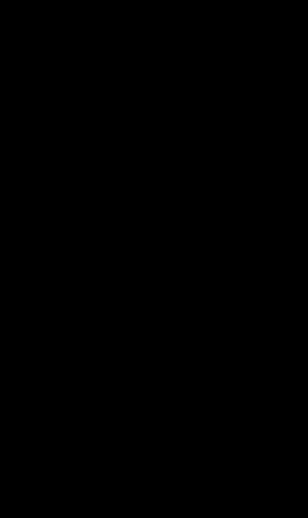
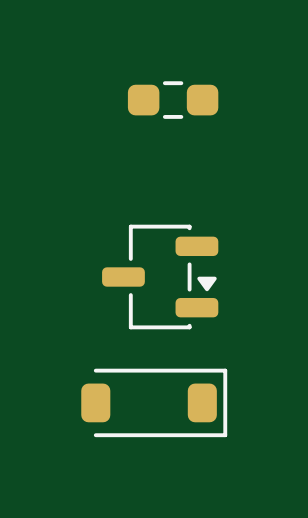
part: none -> (173, 100)
part: none -> (160, 277)
part: none -> (154, 402)

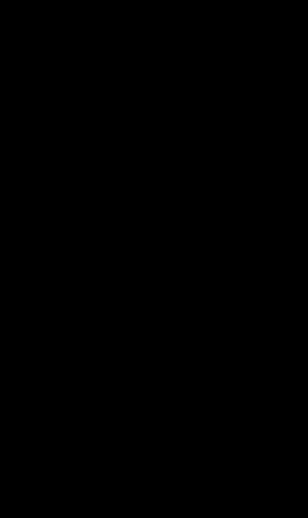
part: (173, 100) -> none
part: (160, 277) -> none
part: (154, 402) -> none

